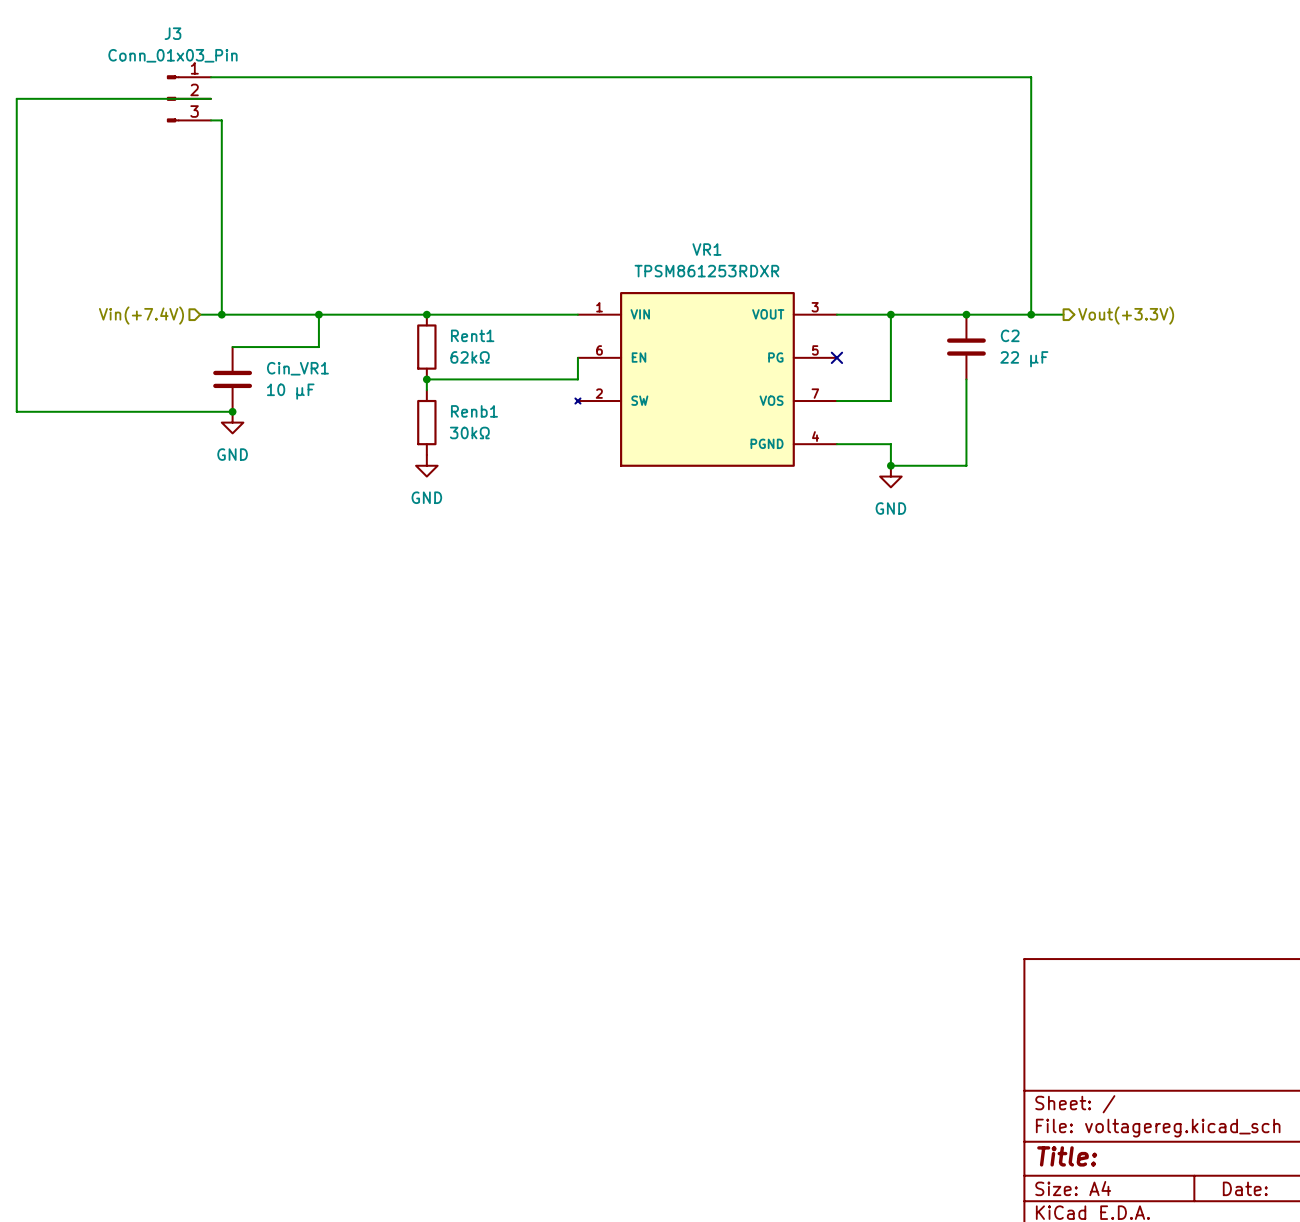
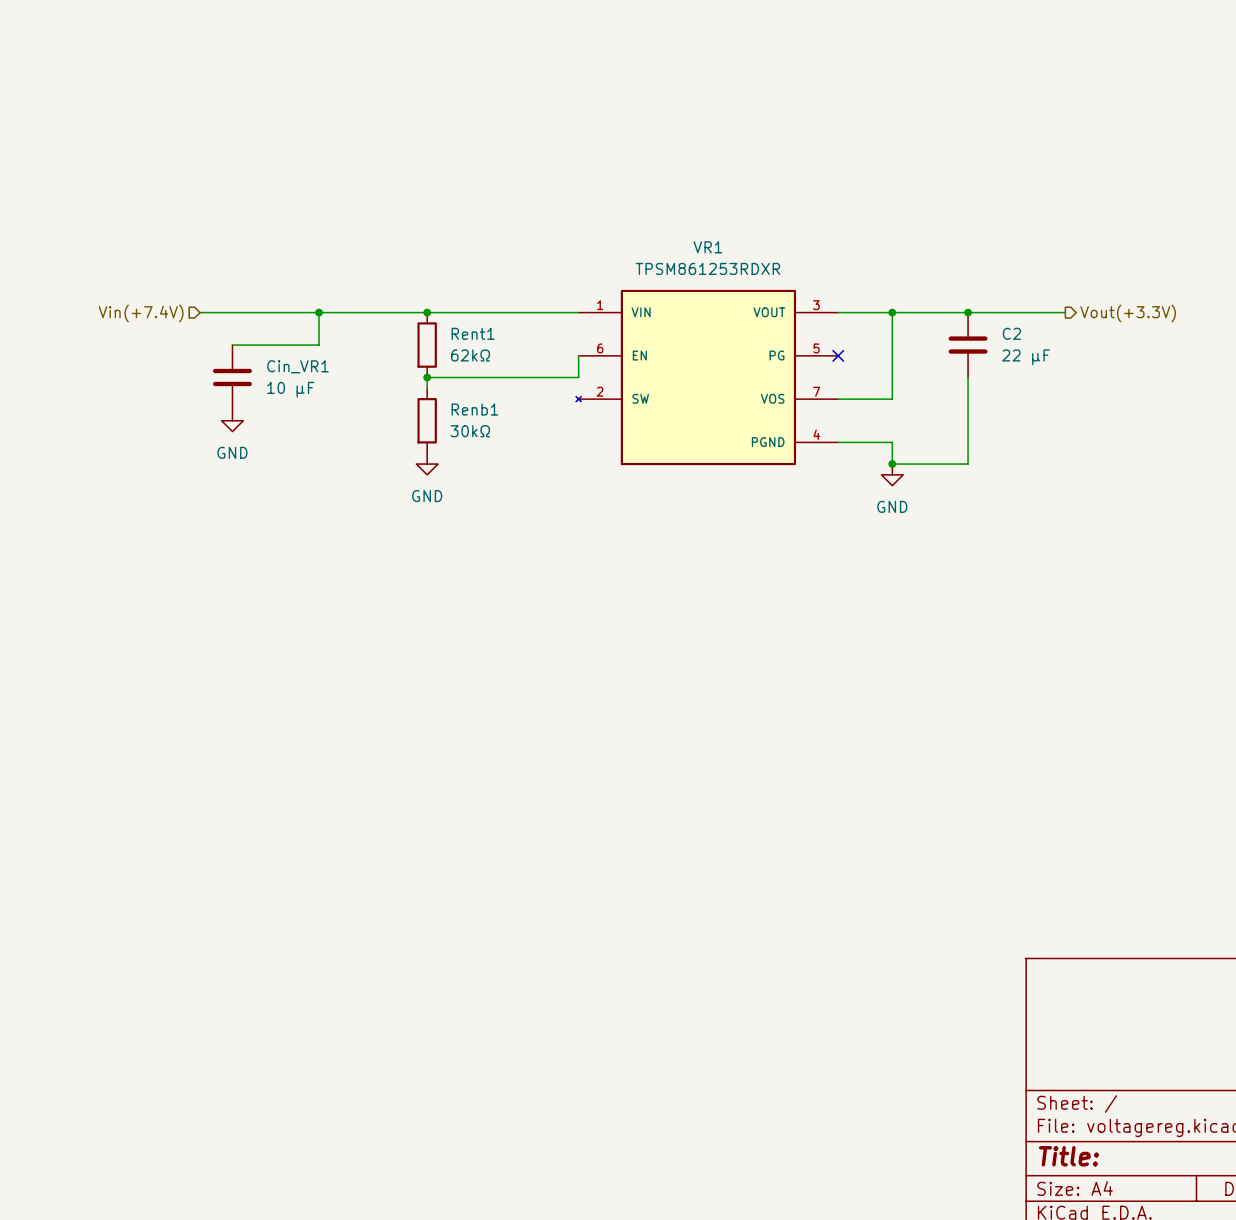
wire: (211, 77) (1031, 77) (1031, 314) -> none
J3: Conn_01x03_Pin (189, 98) -> none
wire: (211, 98) (16, 98) (16, 411) (232, 411) -> none
wire: (211, 120) (221, 120) (221, 314) -> none
junction: (221, 314) -> none
junction: (1031, 314) -> none
junction: (232, 411) -> none

